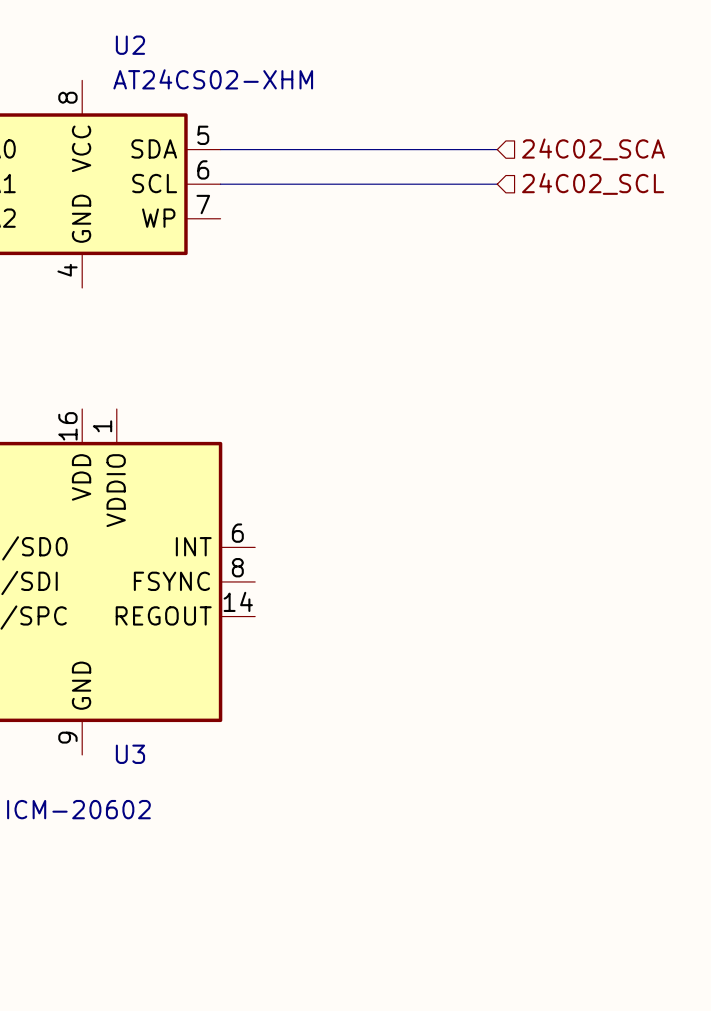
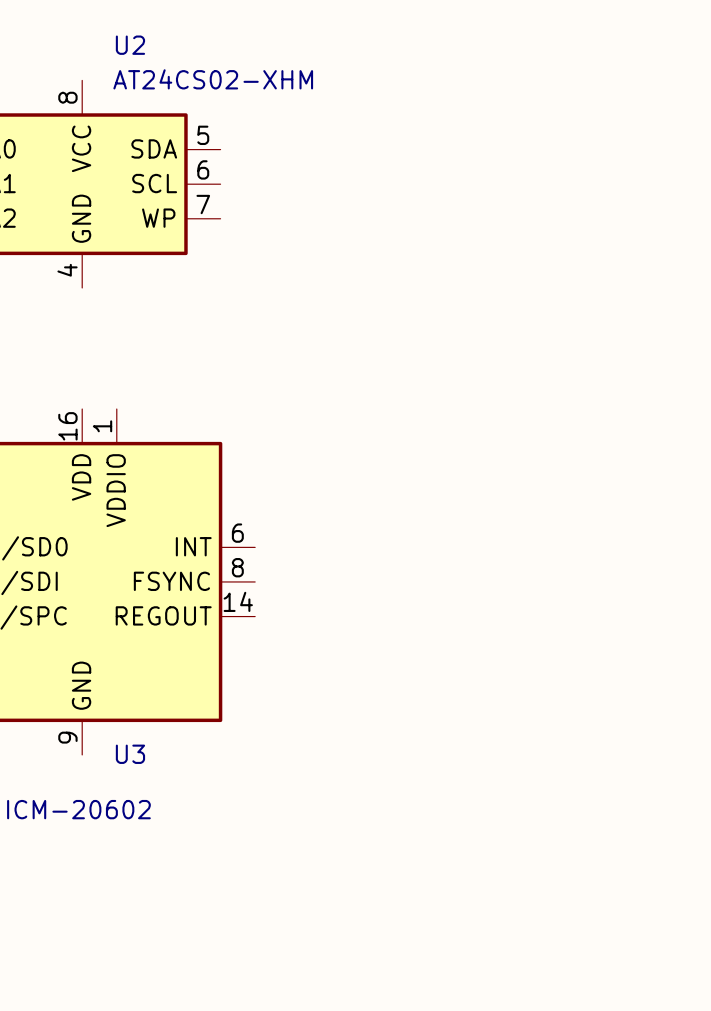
wire: (220, 149) (497, 149) -> none
hierarchical label: 24C02_SCA (593, 149) -> none
hierarchical label: 24C02_SCL (593, 183) -> none
wire: (220, 184) (497, 184) -> none

